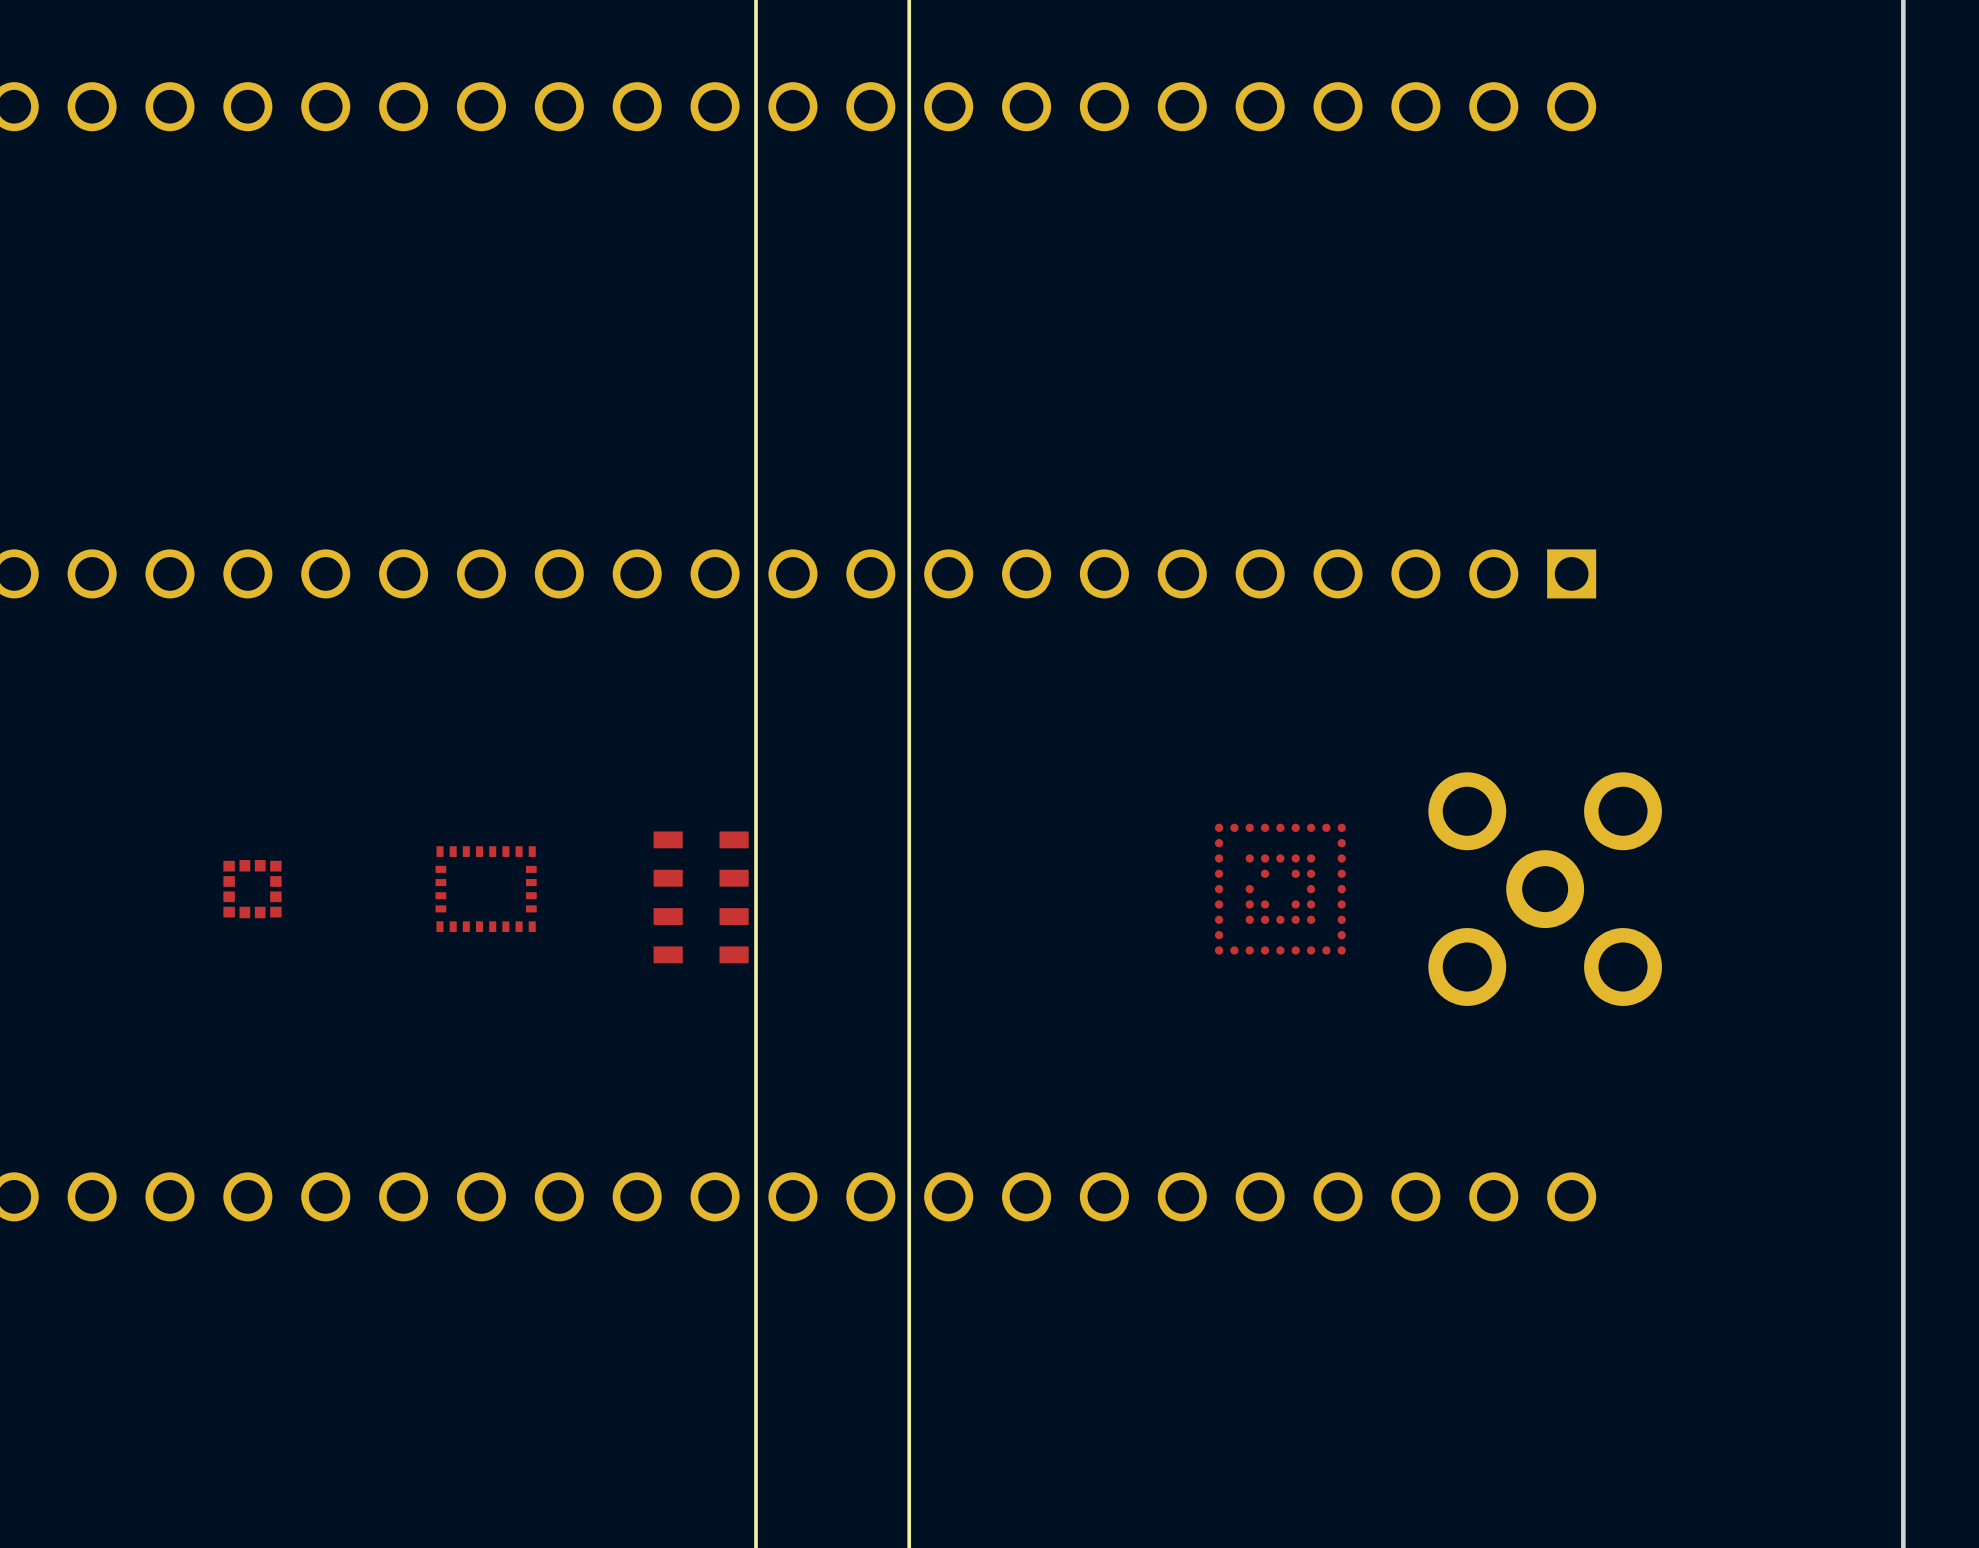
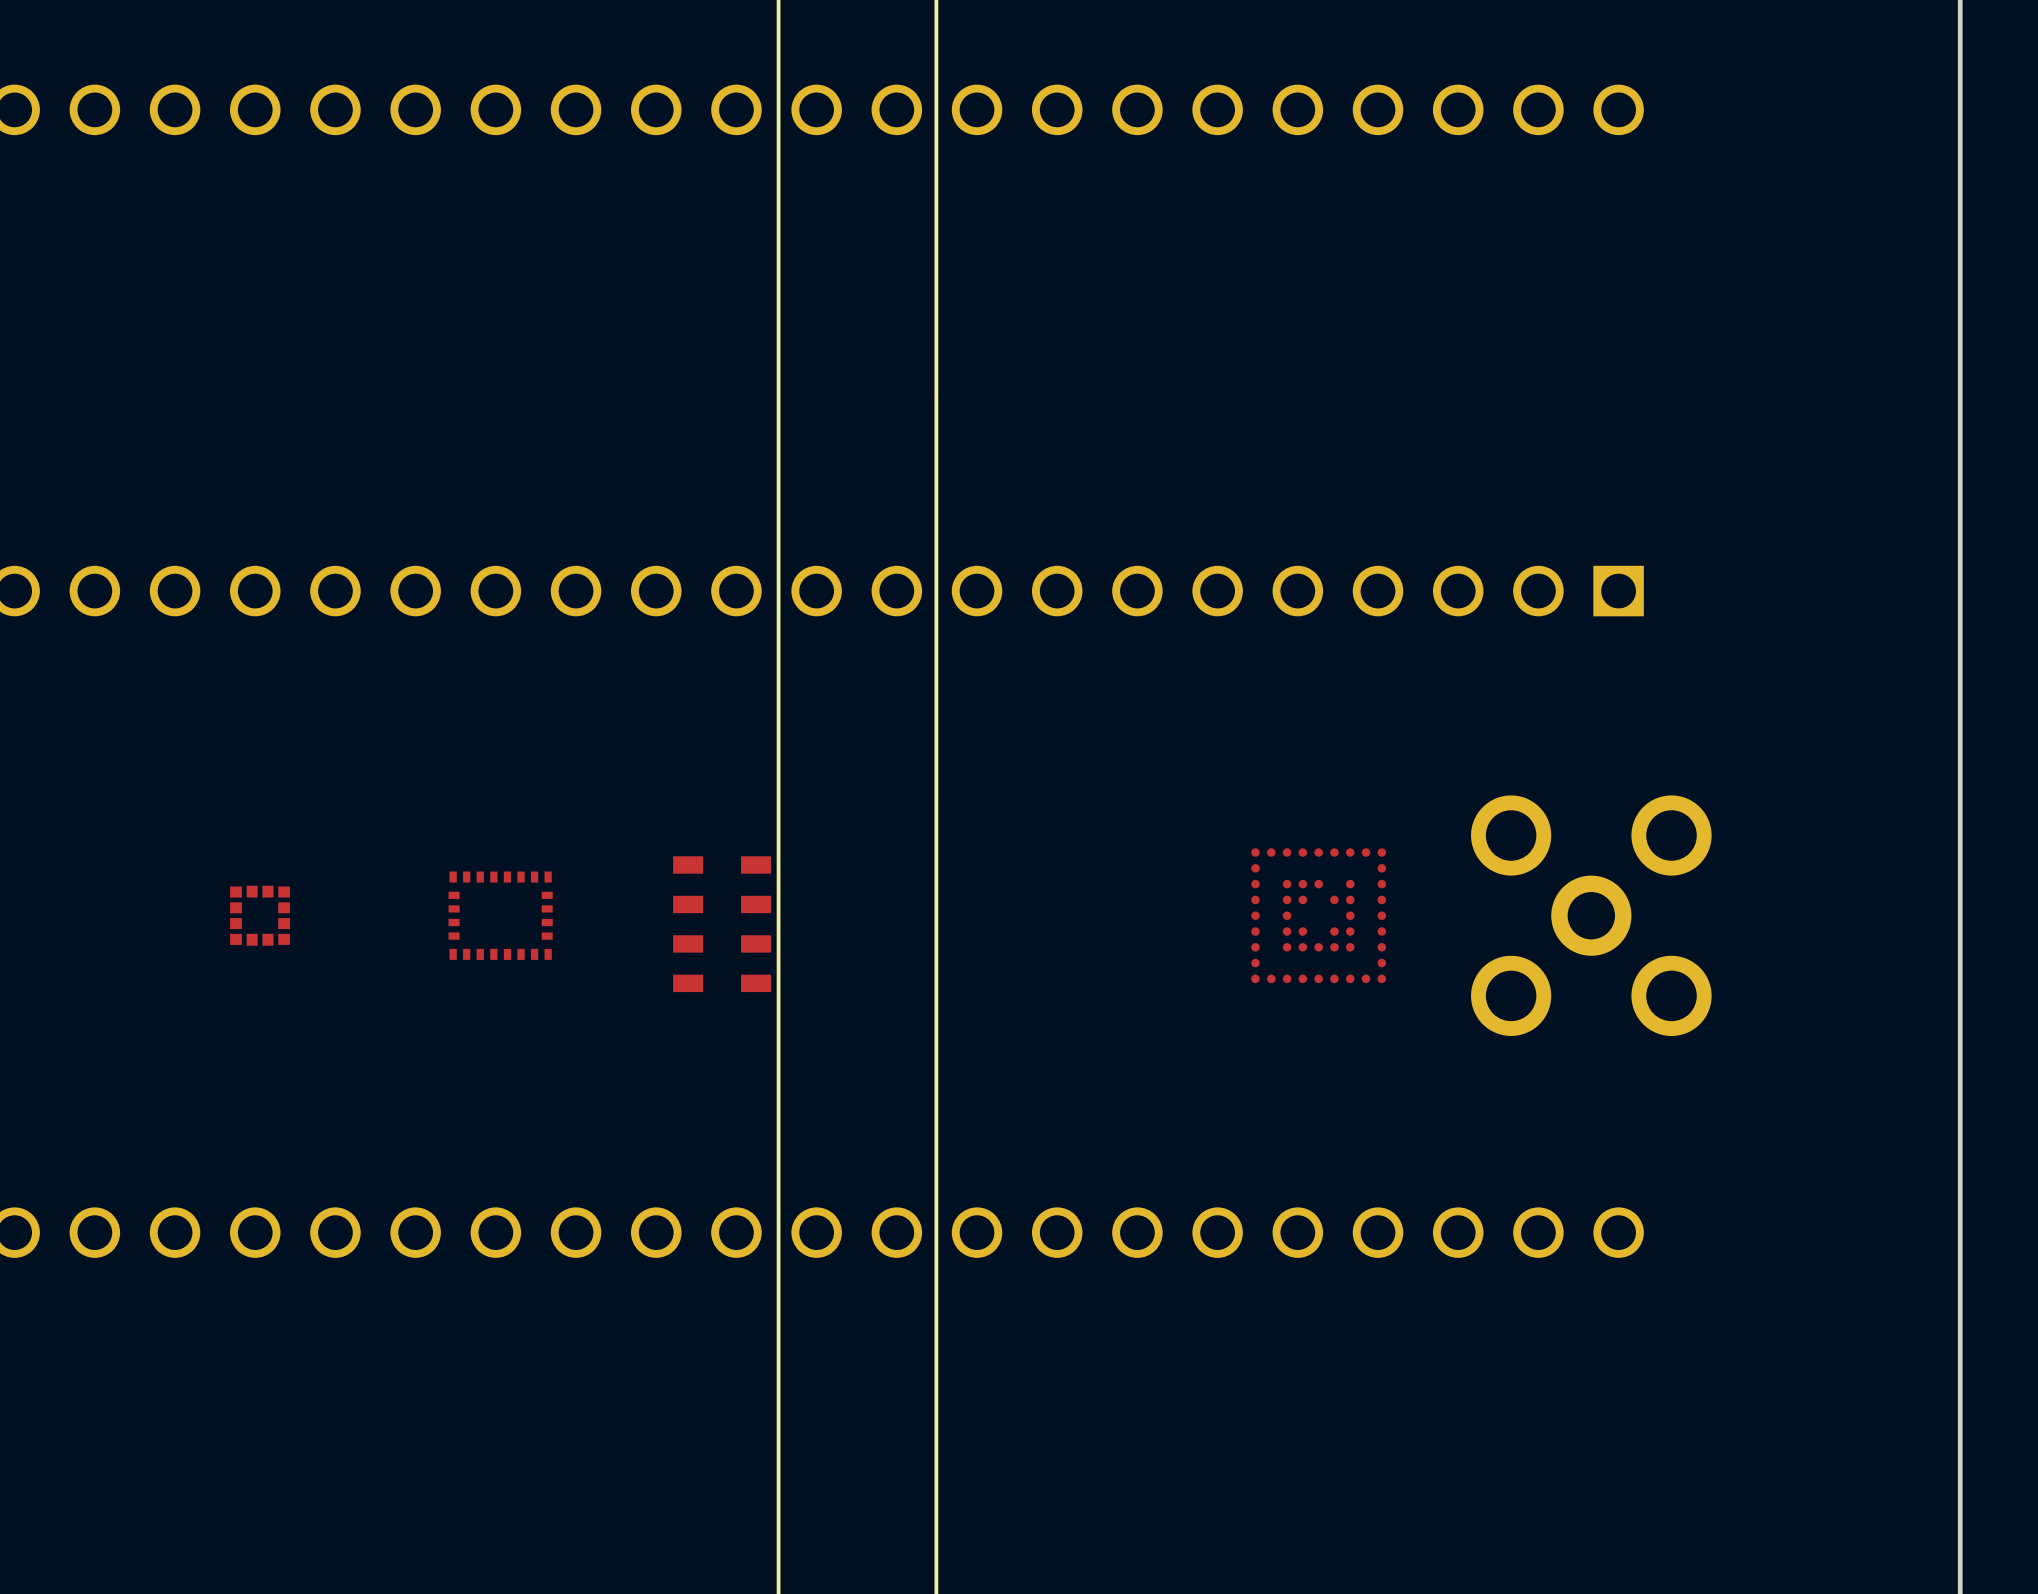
part rotation: 0° (1280, 889) -> 90° clockwise (1318, 915)

